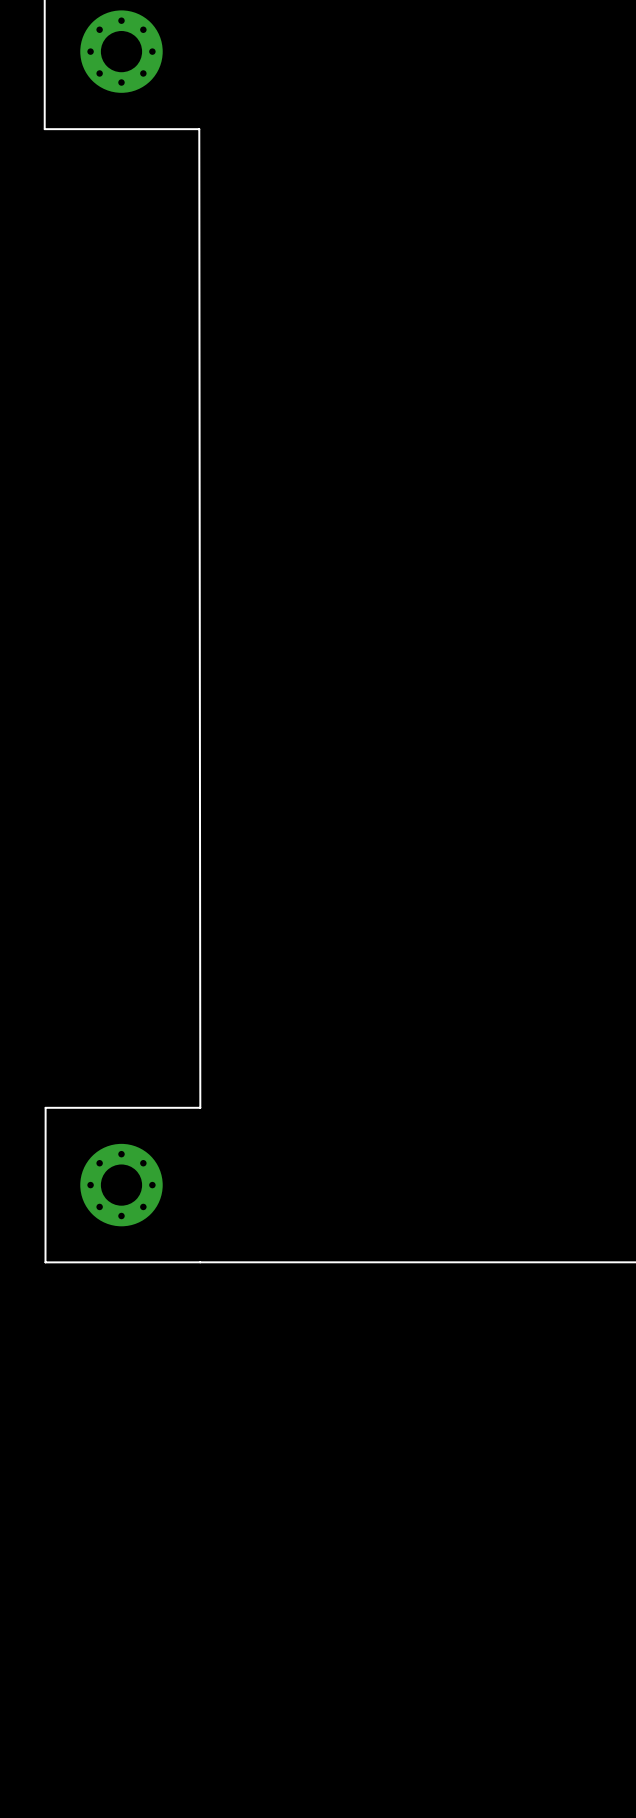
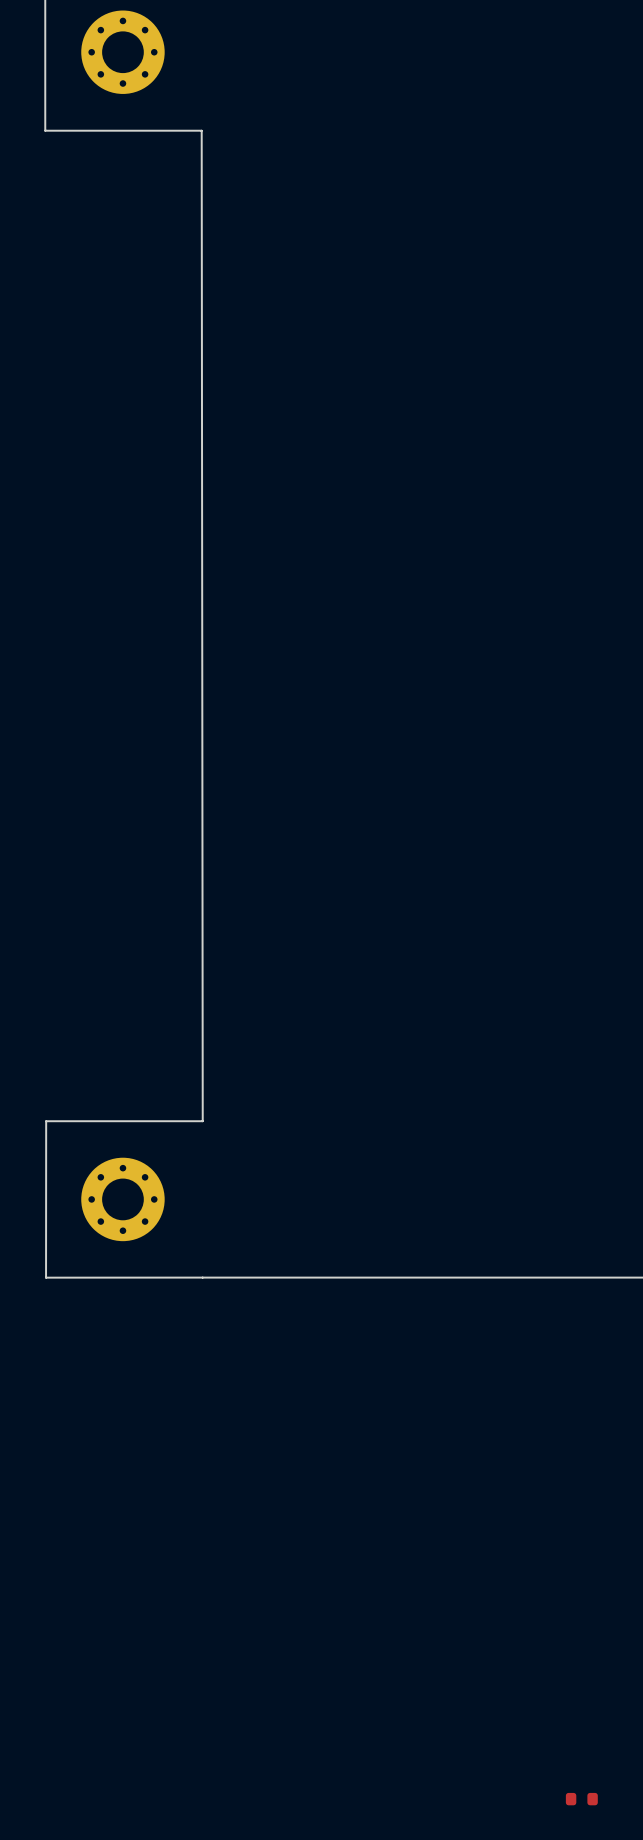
part: none -> (581, 1799)

